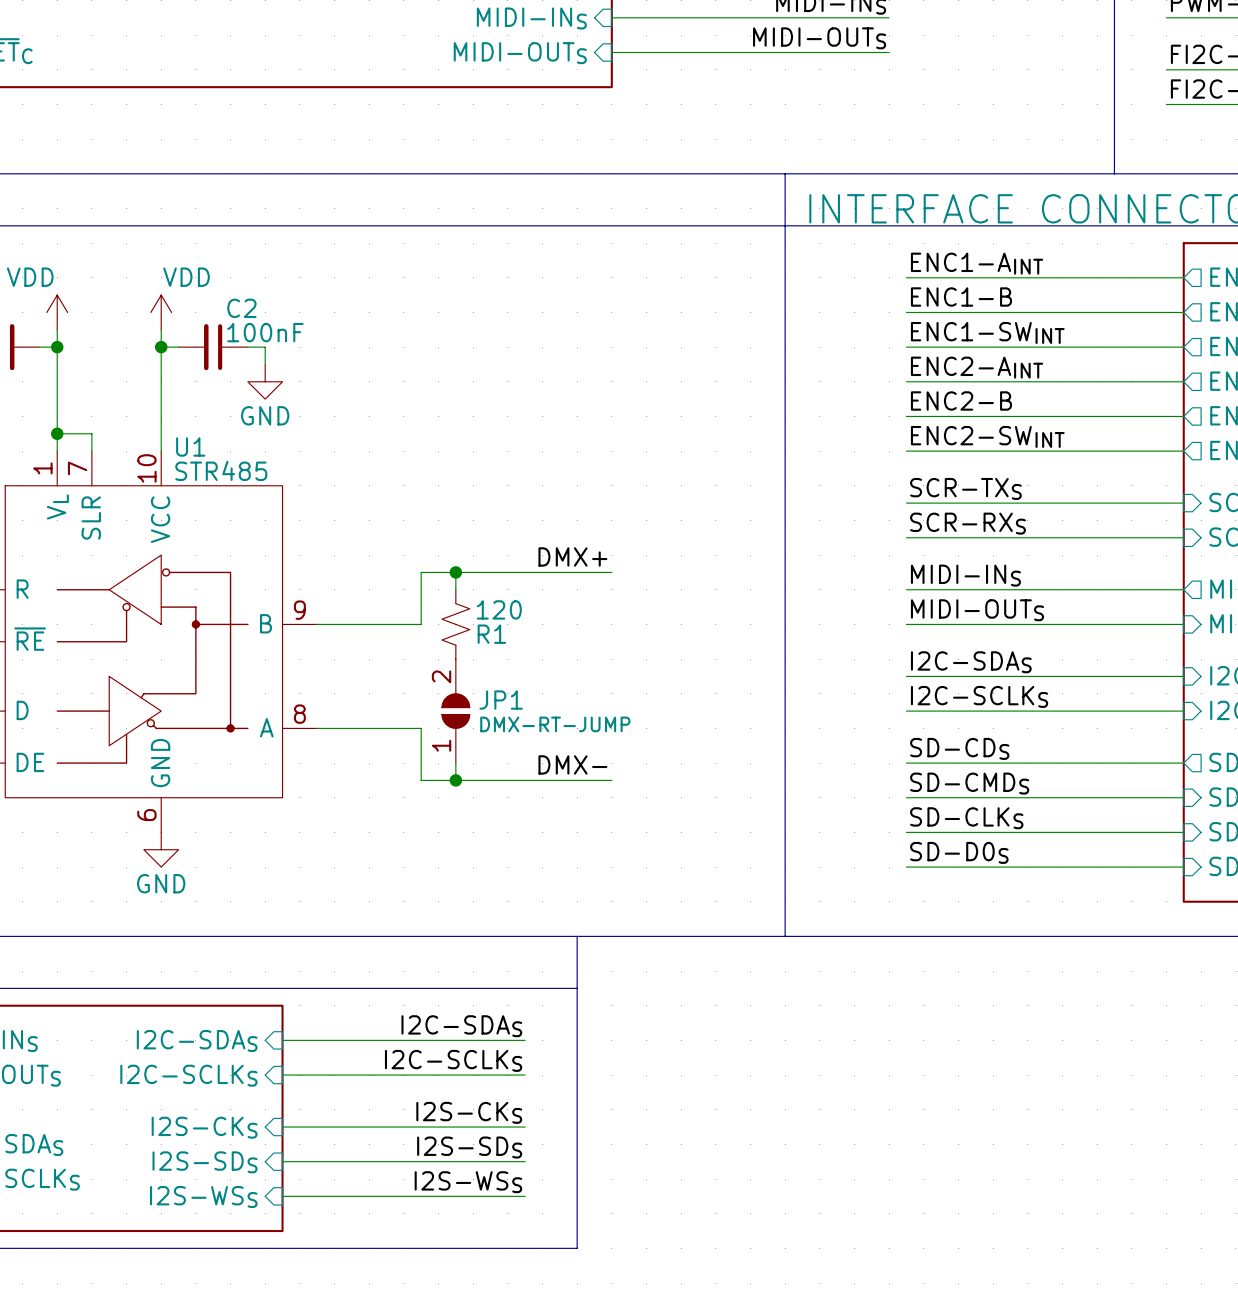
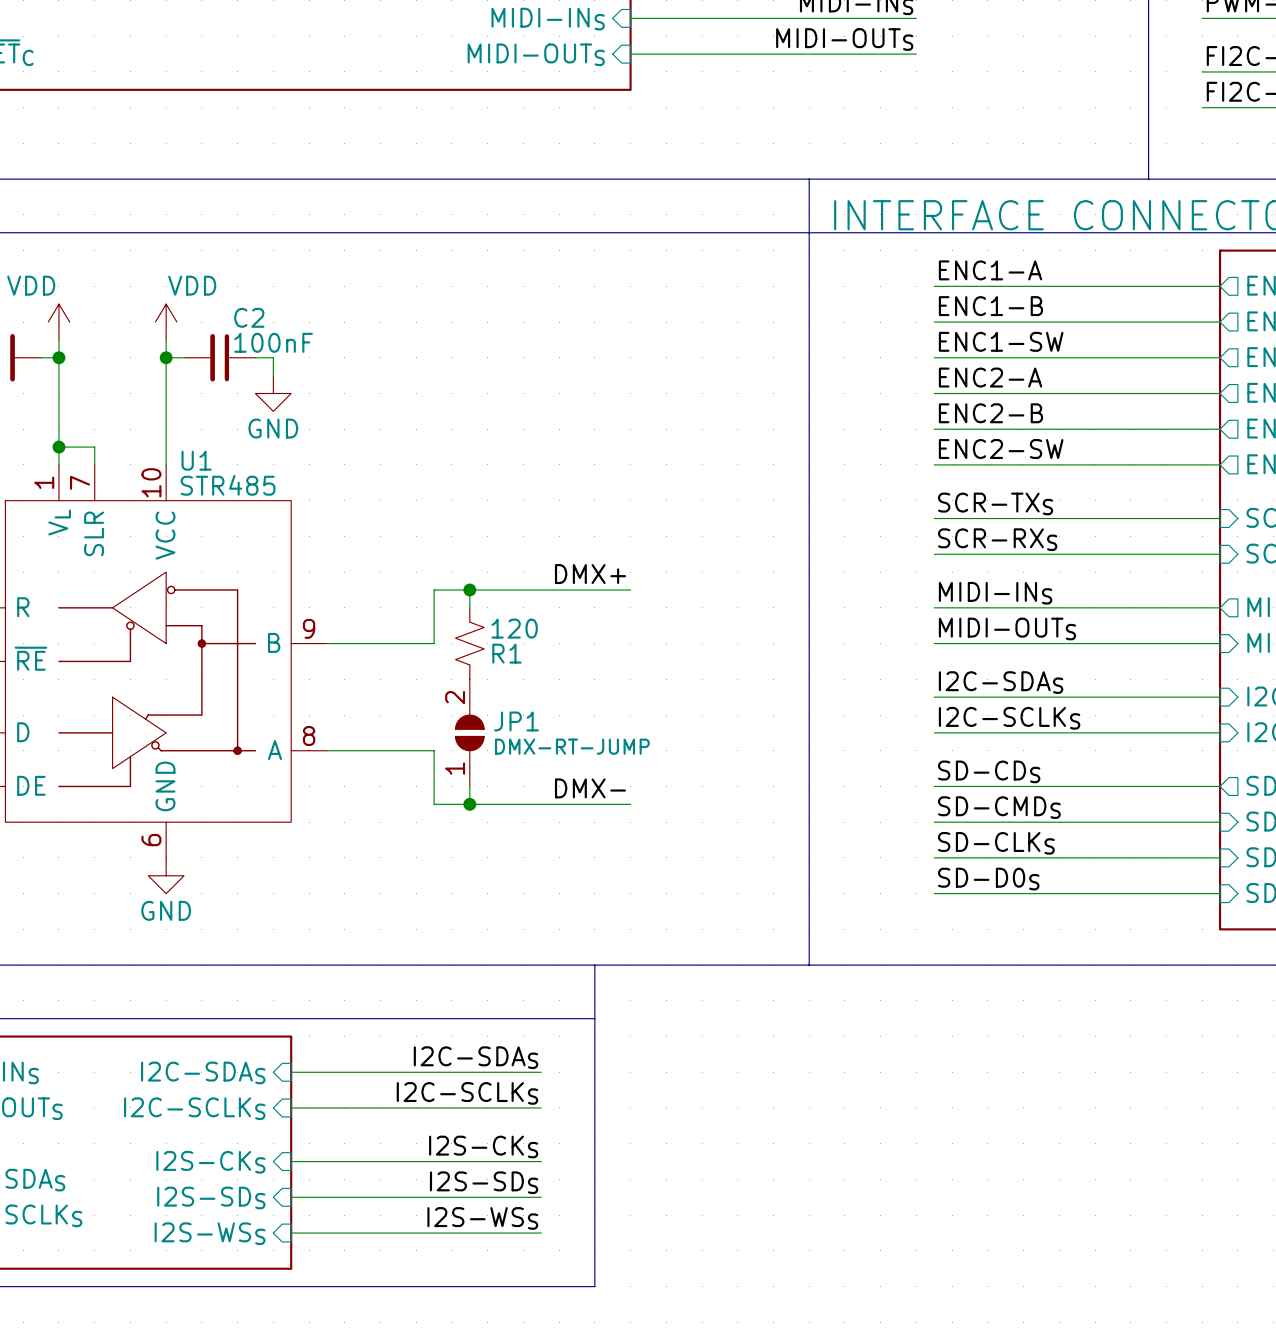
label: ENC1-AINT (977, 263) -> ENC1-A (990, 270)
label: ENC1-SWINT (987, 332) -> ENC1-SW (1001, 341)
label: ENC2-AINT (977, 367) -> ENC2-A (990, 377)
label: ENC2-SWINT (987, 436) -> ENC2-SW (1001, 449)

